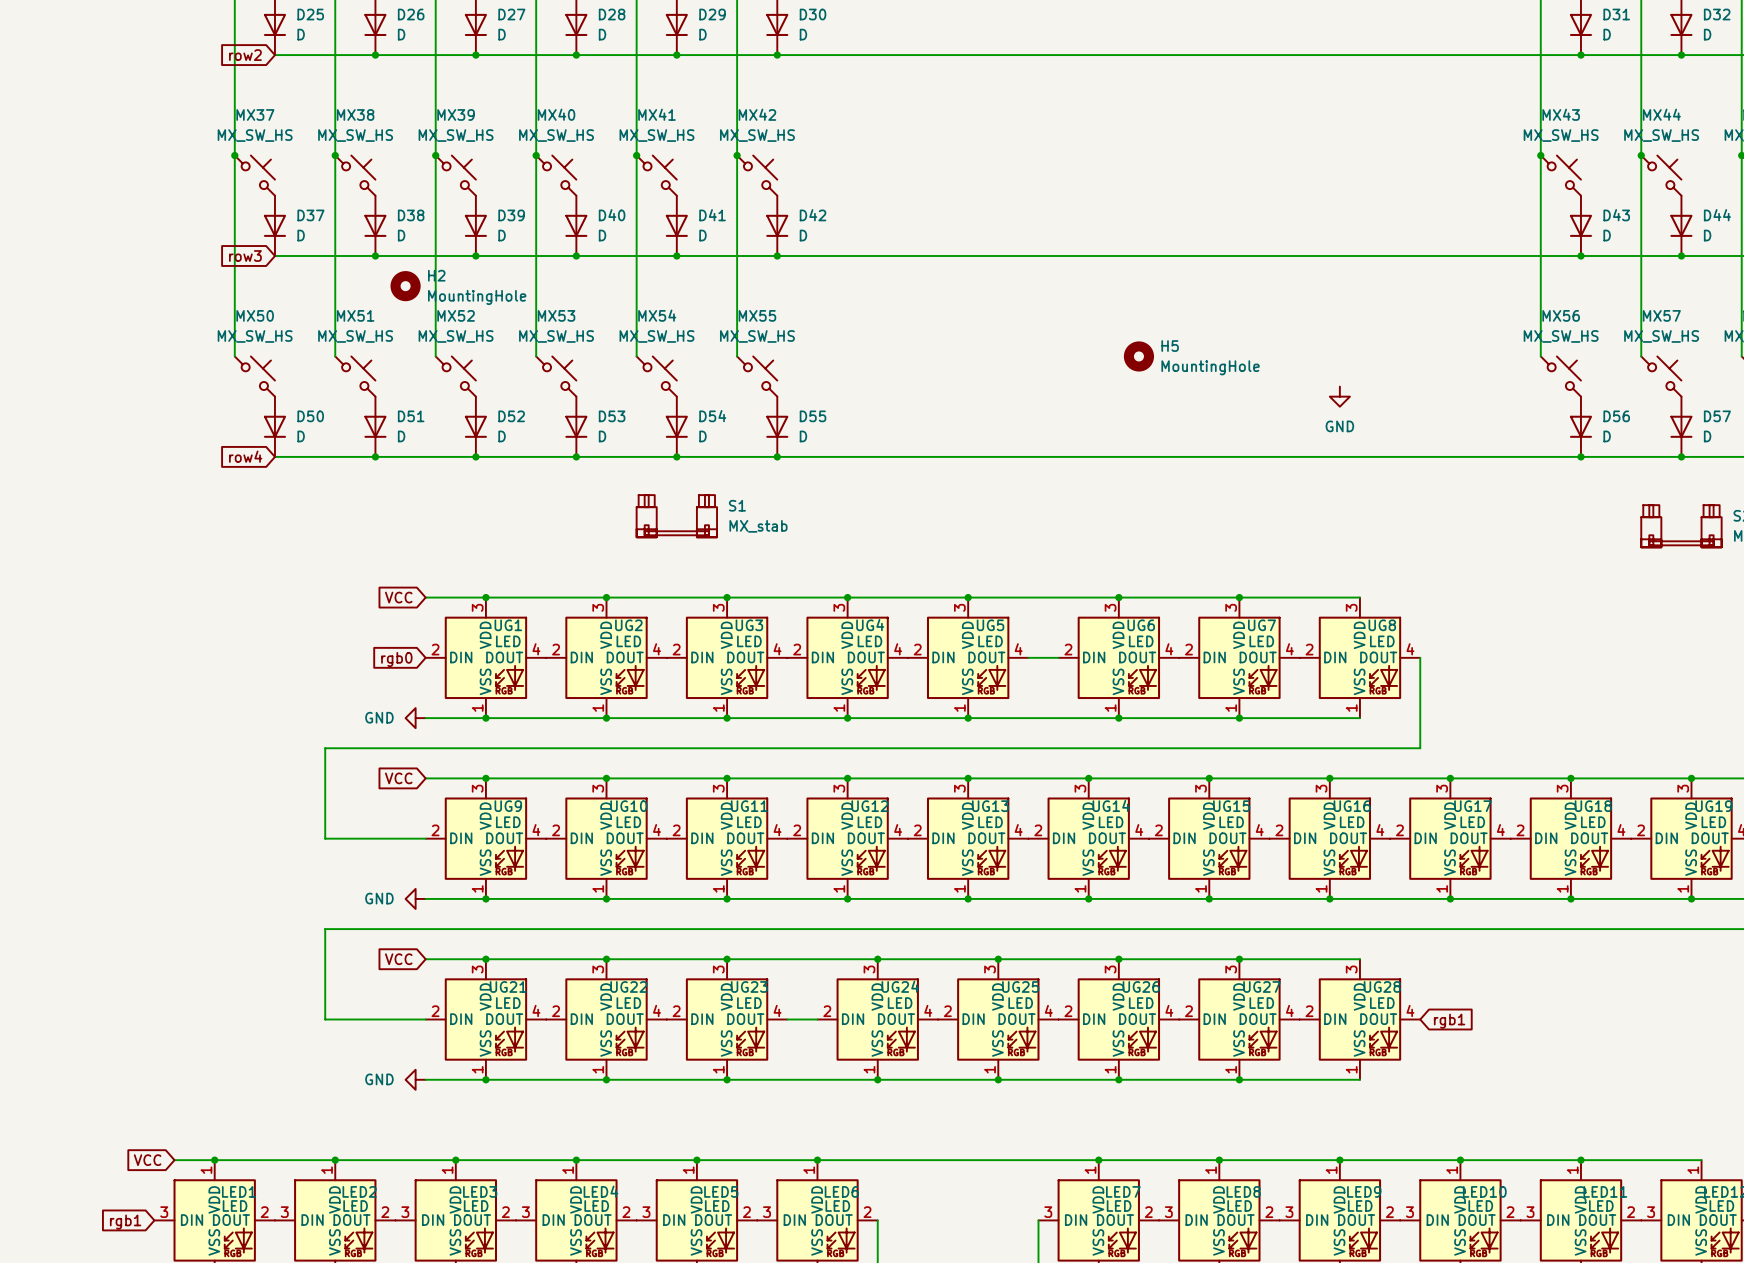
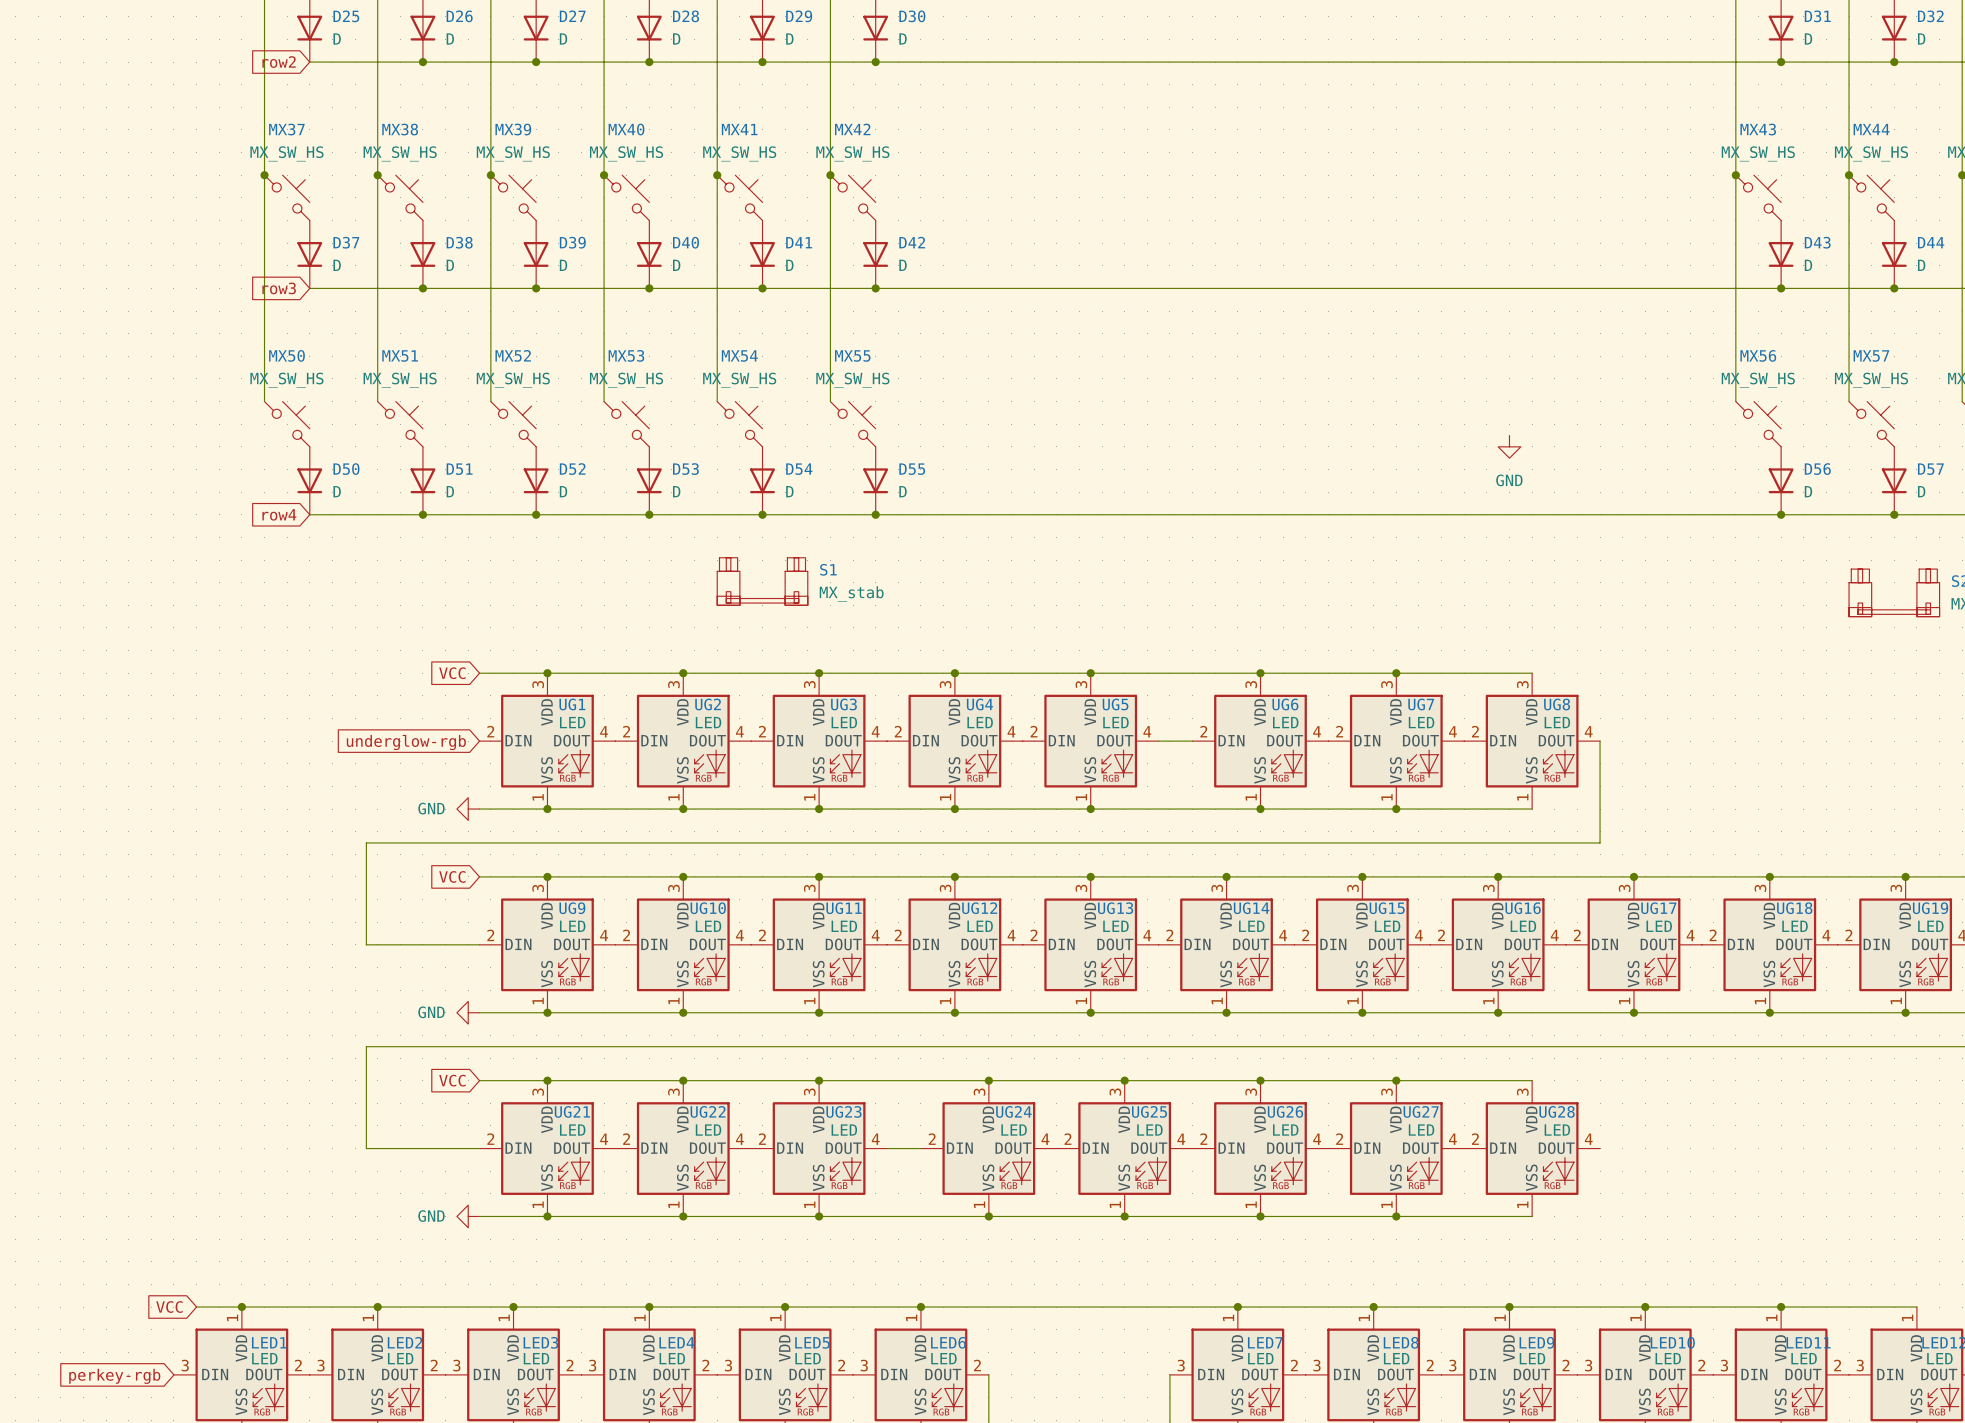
H2: MountingHole (405, 286) -> none
H5: MountingHole (1138, 356) -> none
global label: rgb0 (396, 659) -> underglow-rgb (406, 742)
global label: rgb1 (1449, 1021) -> none
global label: rgb1 (125, 1222) -> perkey-rgb (114, 1376)

